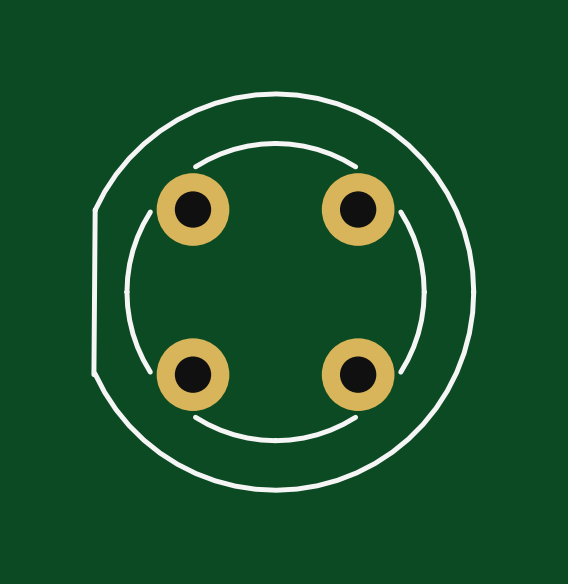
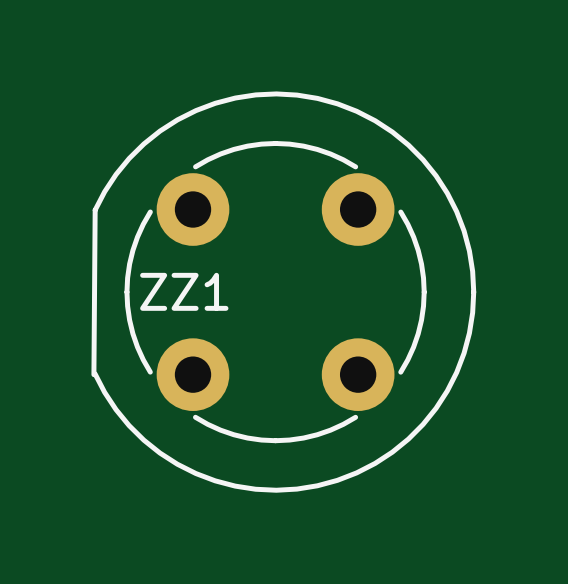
ZZ1 name: none -> ZZ1 (184, 291)

